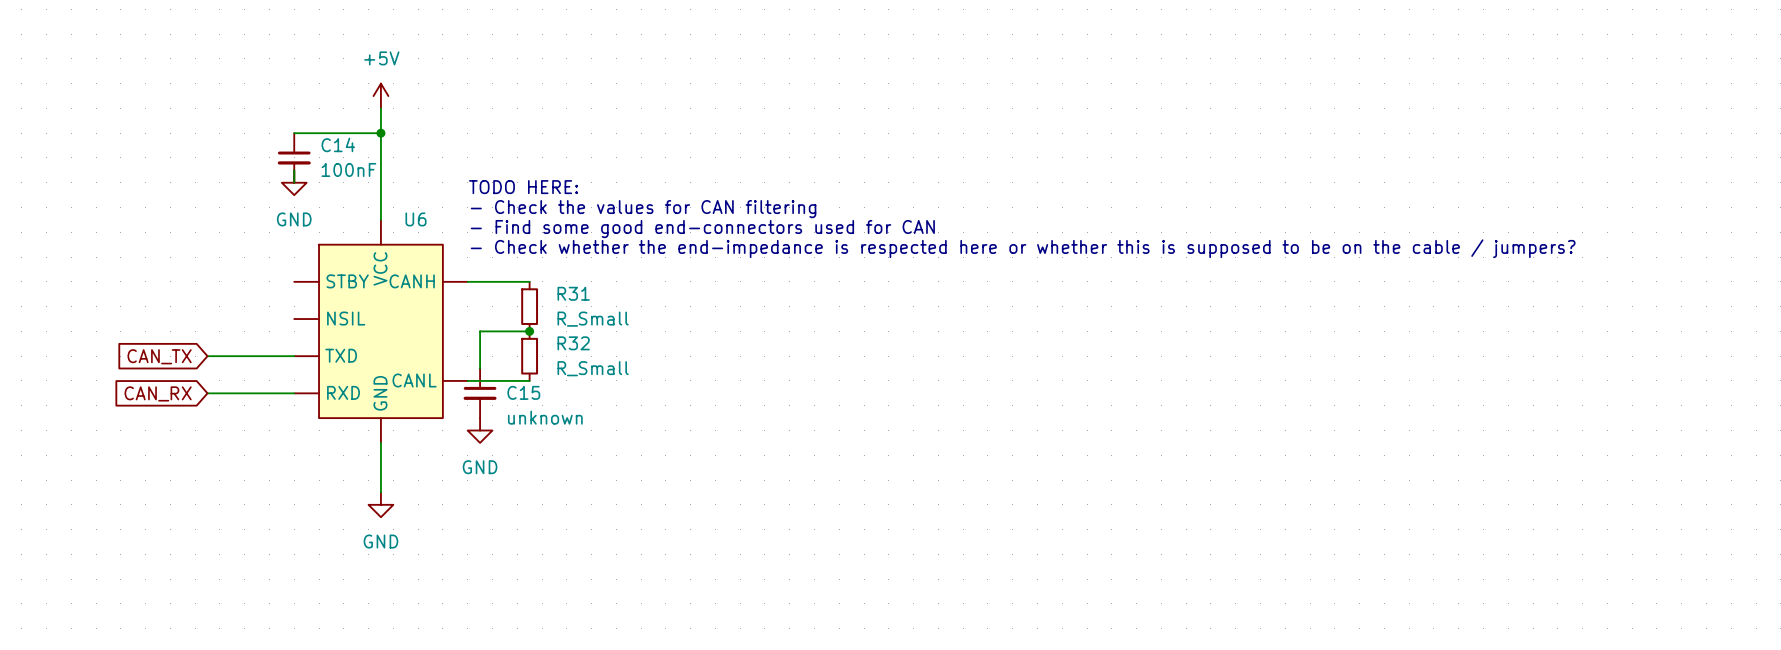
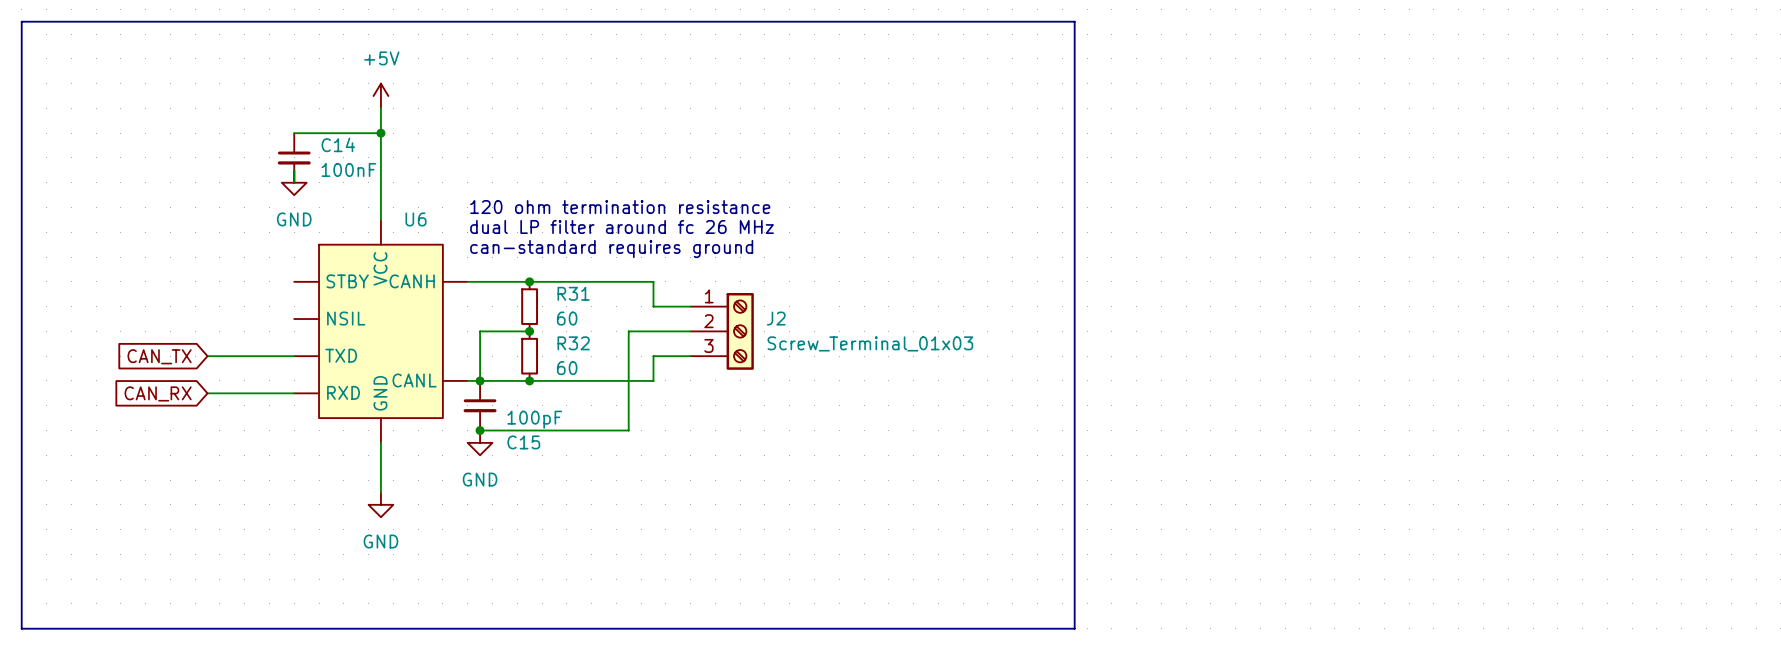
line: none -> (21, 21) (1074, 21) (1074, 628) (21, 628) (21, 21)
text: TODO HERE: (523, 187) -> none
text: - Check the values for CAN filtering (643, 209) -> 120 ohm termination resistance (620, 207)
text: - Find some good end-connectors used for CAN (702, 229) -> dual LP filter around fc 26 MHz (622, 226)
text: - Check whether the end-impedance is respected here or whether this is supposed to be on the cable / jumpers? (1023, 248) -> can-standard requires ground (611, 248)
wire: none -> (529, 281) (653, 281) (653, 306) (690, 306)
junction: none -> (529, 281)
R31 value: R_Small (593, 319) -> 60 (567, 318)
wire: none -> (690, 331) (628, 331) (628, 430) (480, 430)
J2: none -> Screw_Terminal_01x03 (722, 331)
wire: none -> (690, 356) (653, 356) (653, 380) (529, 380)
R32 value: R_Small (593, 368) -> 60 (567, 368)
junction: none -> (480, 380)
junction: none -> (529, 380)
C15 name position: C15 (523, 392) -> C15 (523, 442)
C15 position: (480, 393) -> (480, 405)
C15 value: unknown (545, 417) -> 100pF (534, 419)
power symbol position: GND (480, 430) -> GND (480, 442)
junction: none -> (480, 430)

